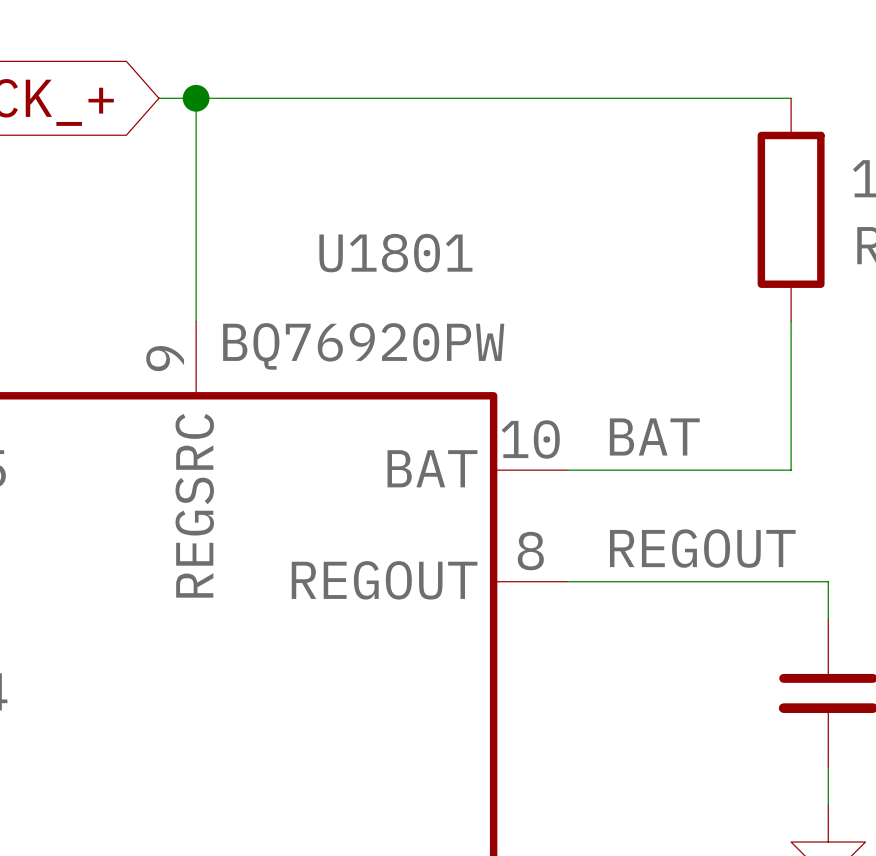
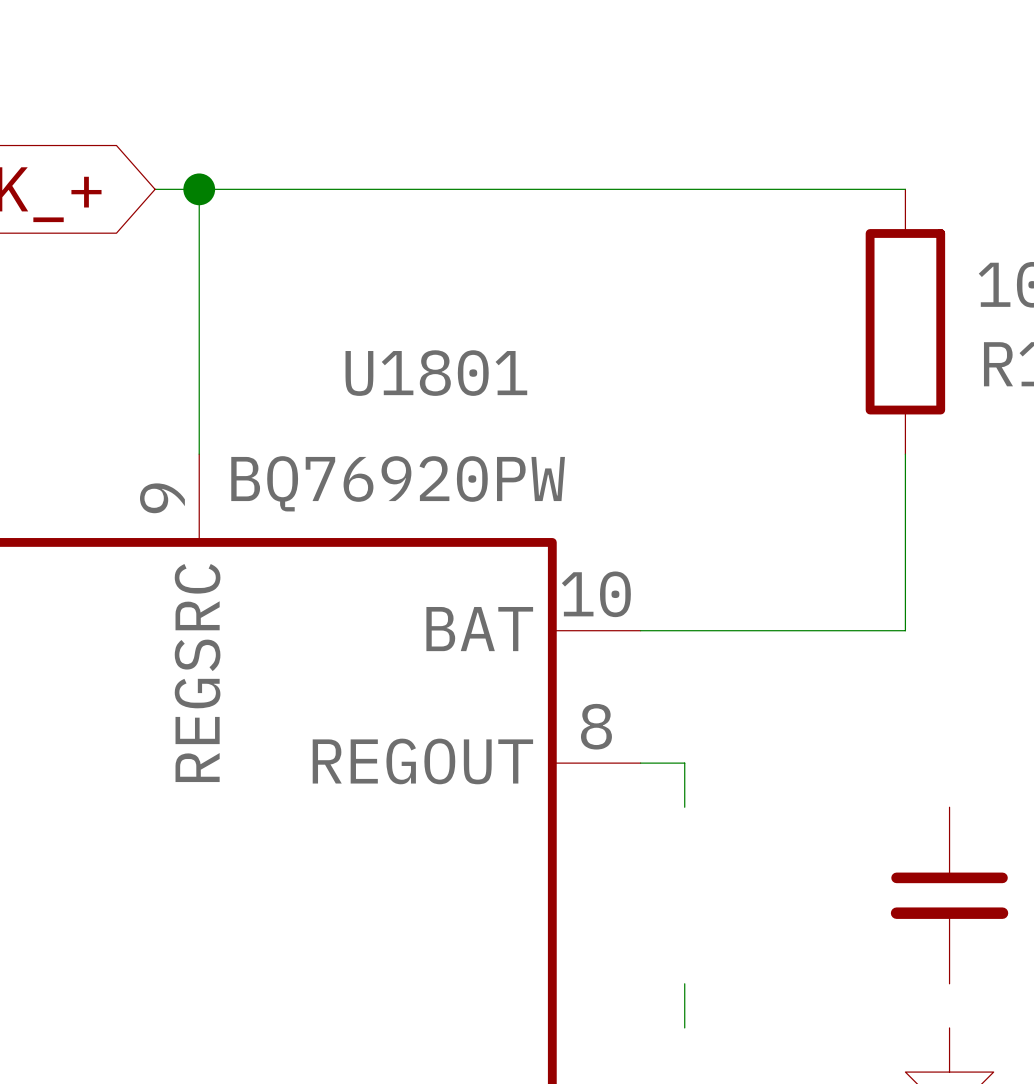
label: BAT (654, 436) -> none
label: REGOUT (702, 548) -> none
wire: (605, 581) (828, 581) (828, 618) -> (684, 763) (684, 807)
wire: (828, 767) (828, 804) -> (684, 983) (684, 1027)

